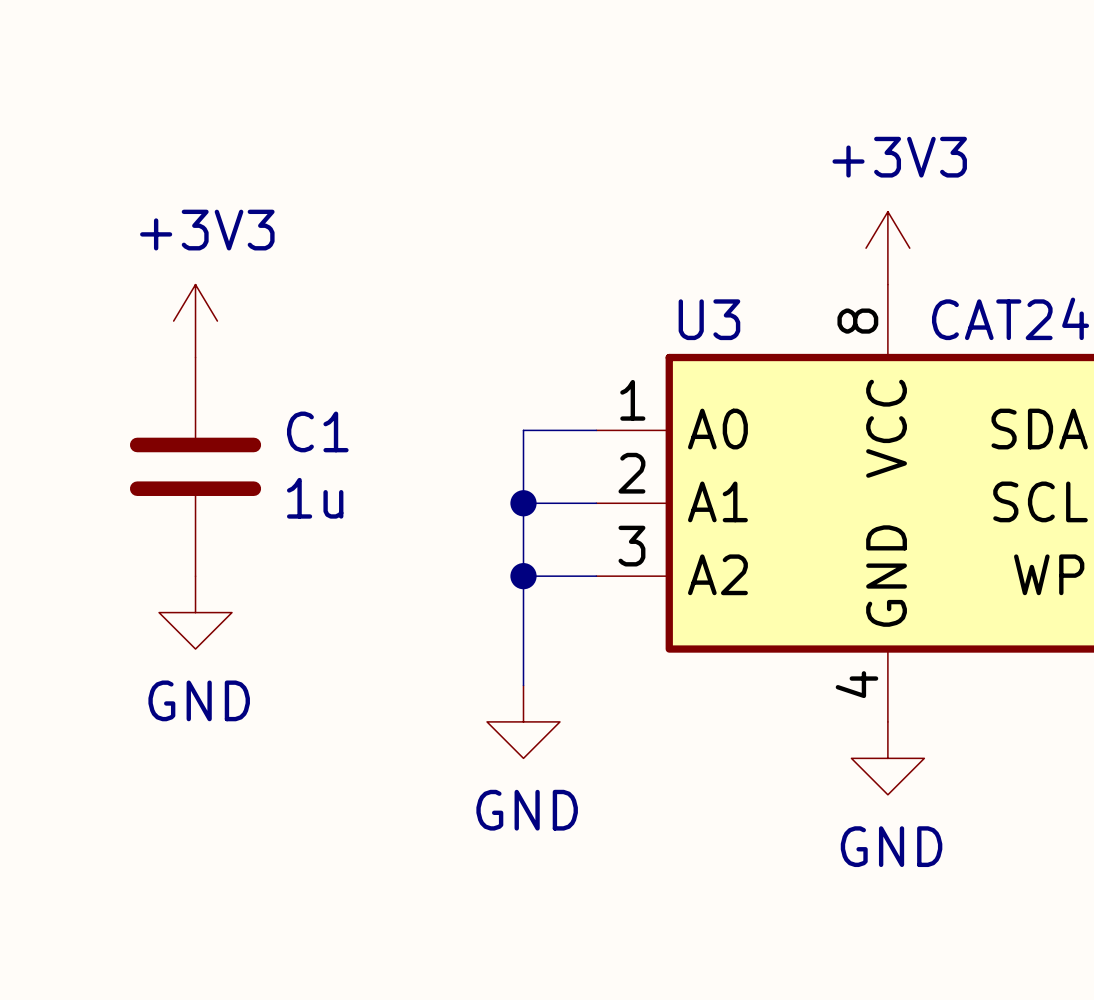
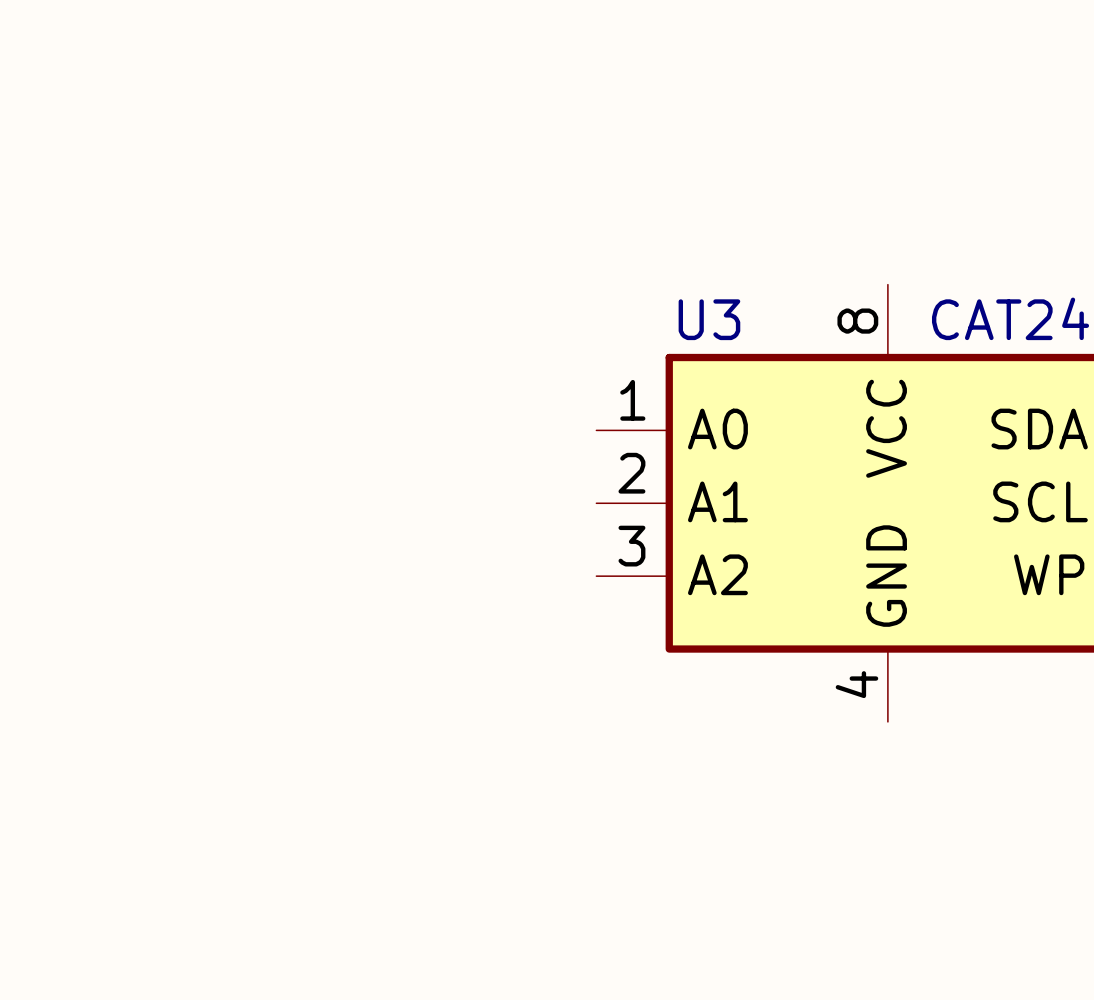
power symbol: +3V3 (887, 248) -> none
power symbol: +3V3 (195, 321) -> none
wire: (596, 430) (523, 430) (523, 685) -> none
C1: 1u (195, 466) -> none
wire: (523, 503) (596, 503) -> none
junction: (523, 503) -> none
wire: (523, 576) (596, 576) -> none
junction: (523, 576) -> none
power symbol: GND (195, 612) -> none
power symbol: GND (523, 721) -> none
power symbol: GND (887, 758) -> none

